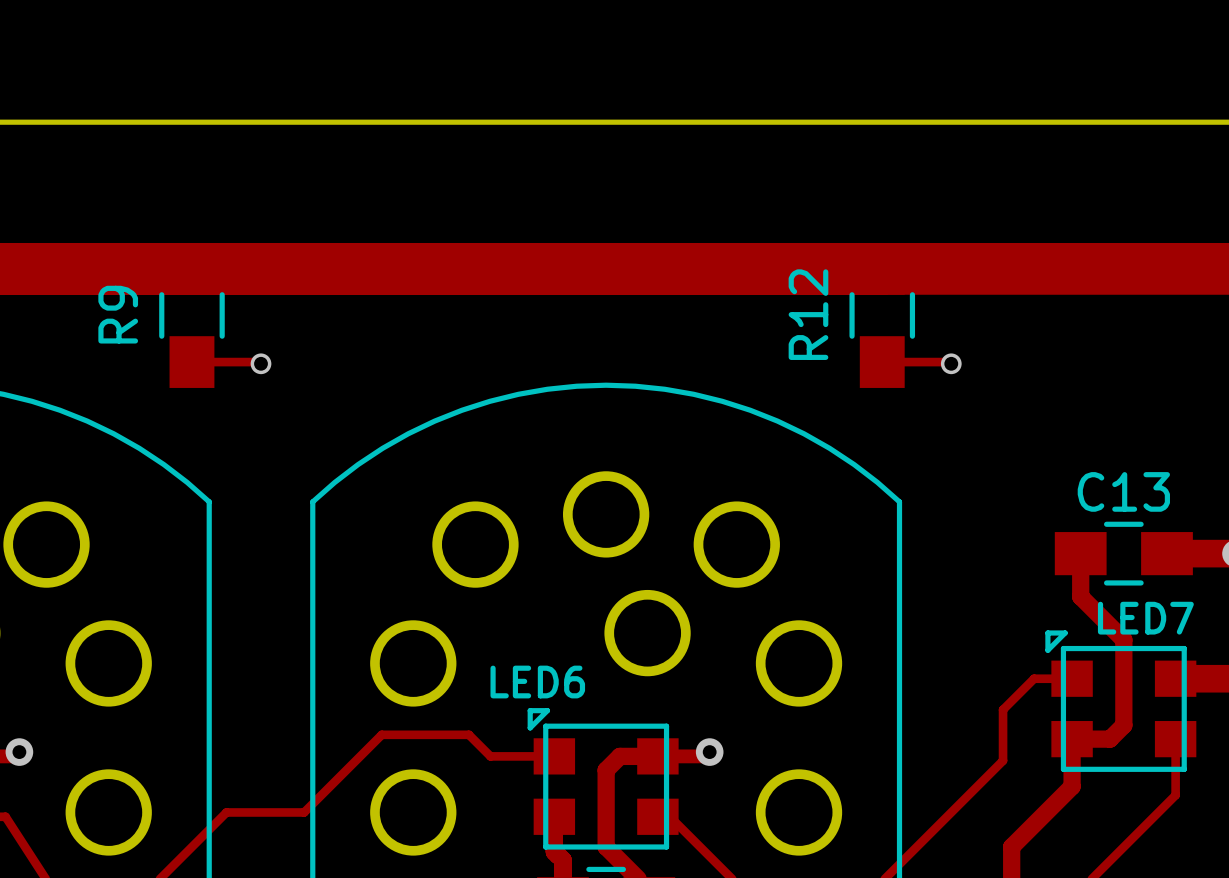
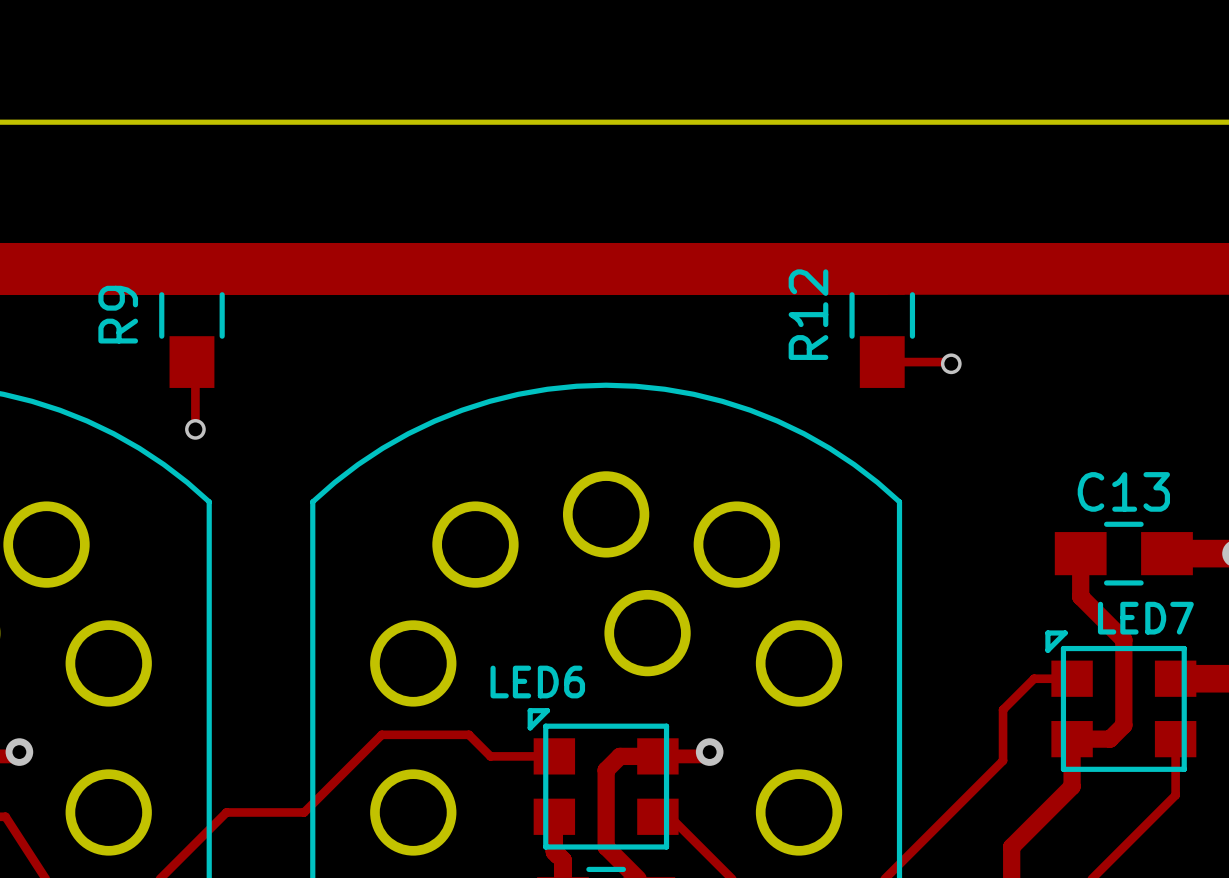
track: (191, 362) (259, 362) (261, 363) -> (191, 362) (195, 365) (195, 429)
via position: (261, 363) -> (195, 429)

